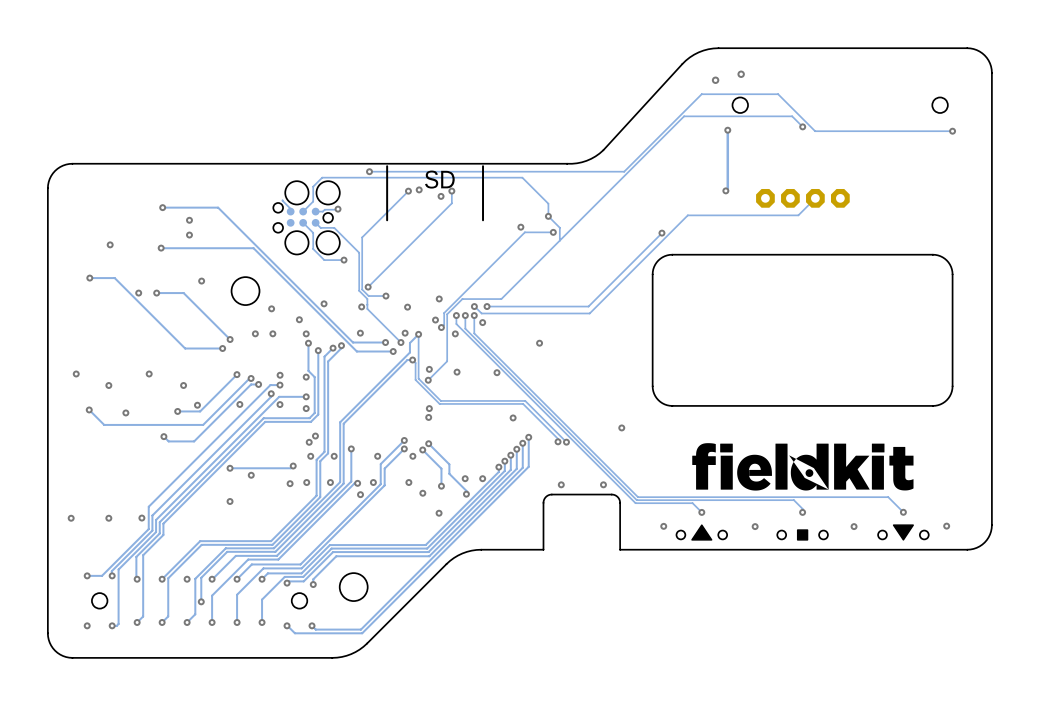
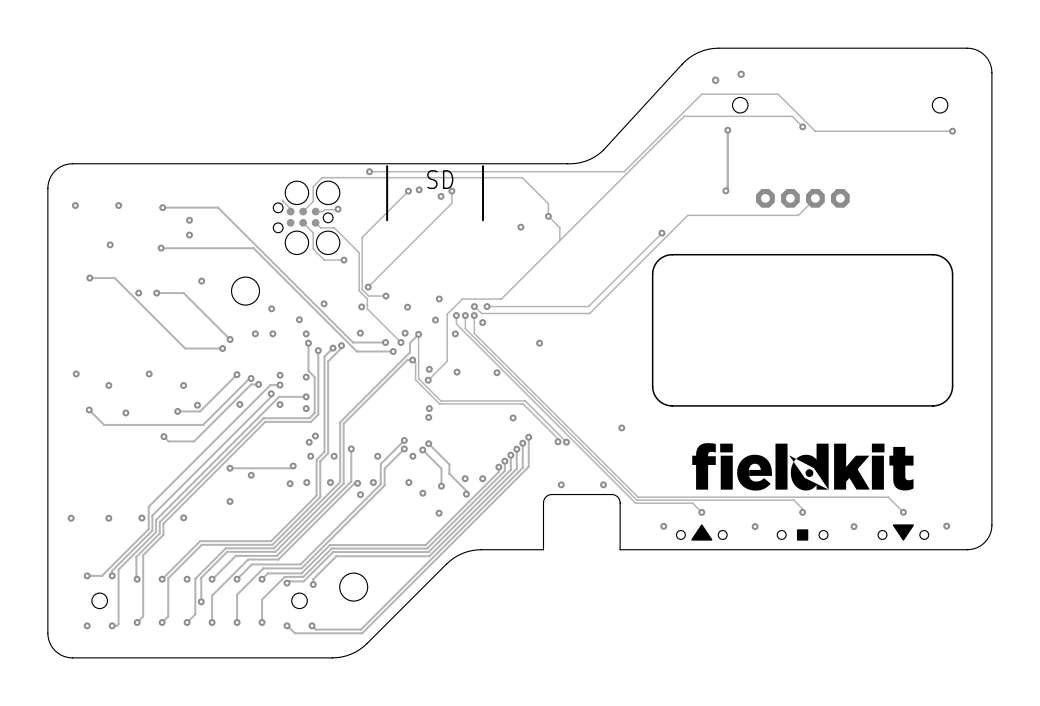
via: none -> (75, 205)
via: none -> (118, 205)
track: (553, 232) (524, 232) (444, 313) (444, 324) (441, 327) -> none
via: (553, 232) -> none
via: (441, 327) -> none
via: none -> (183, 517)

